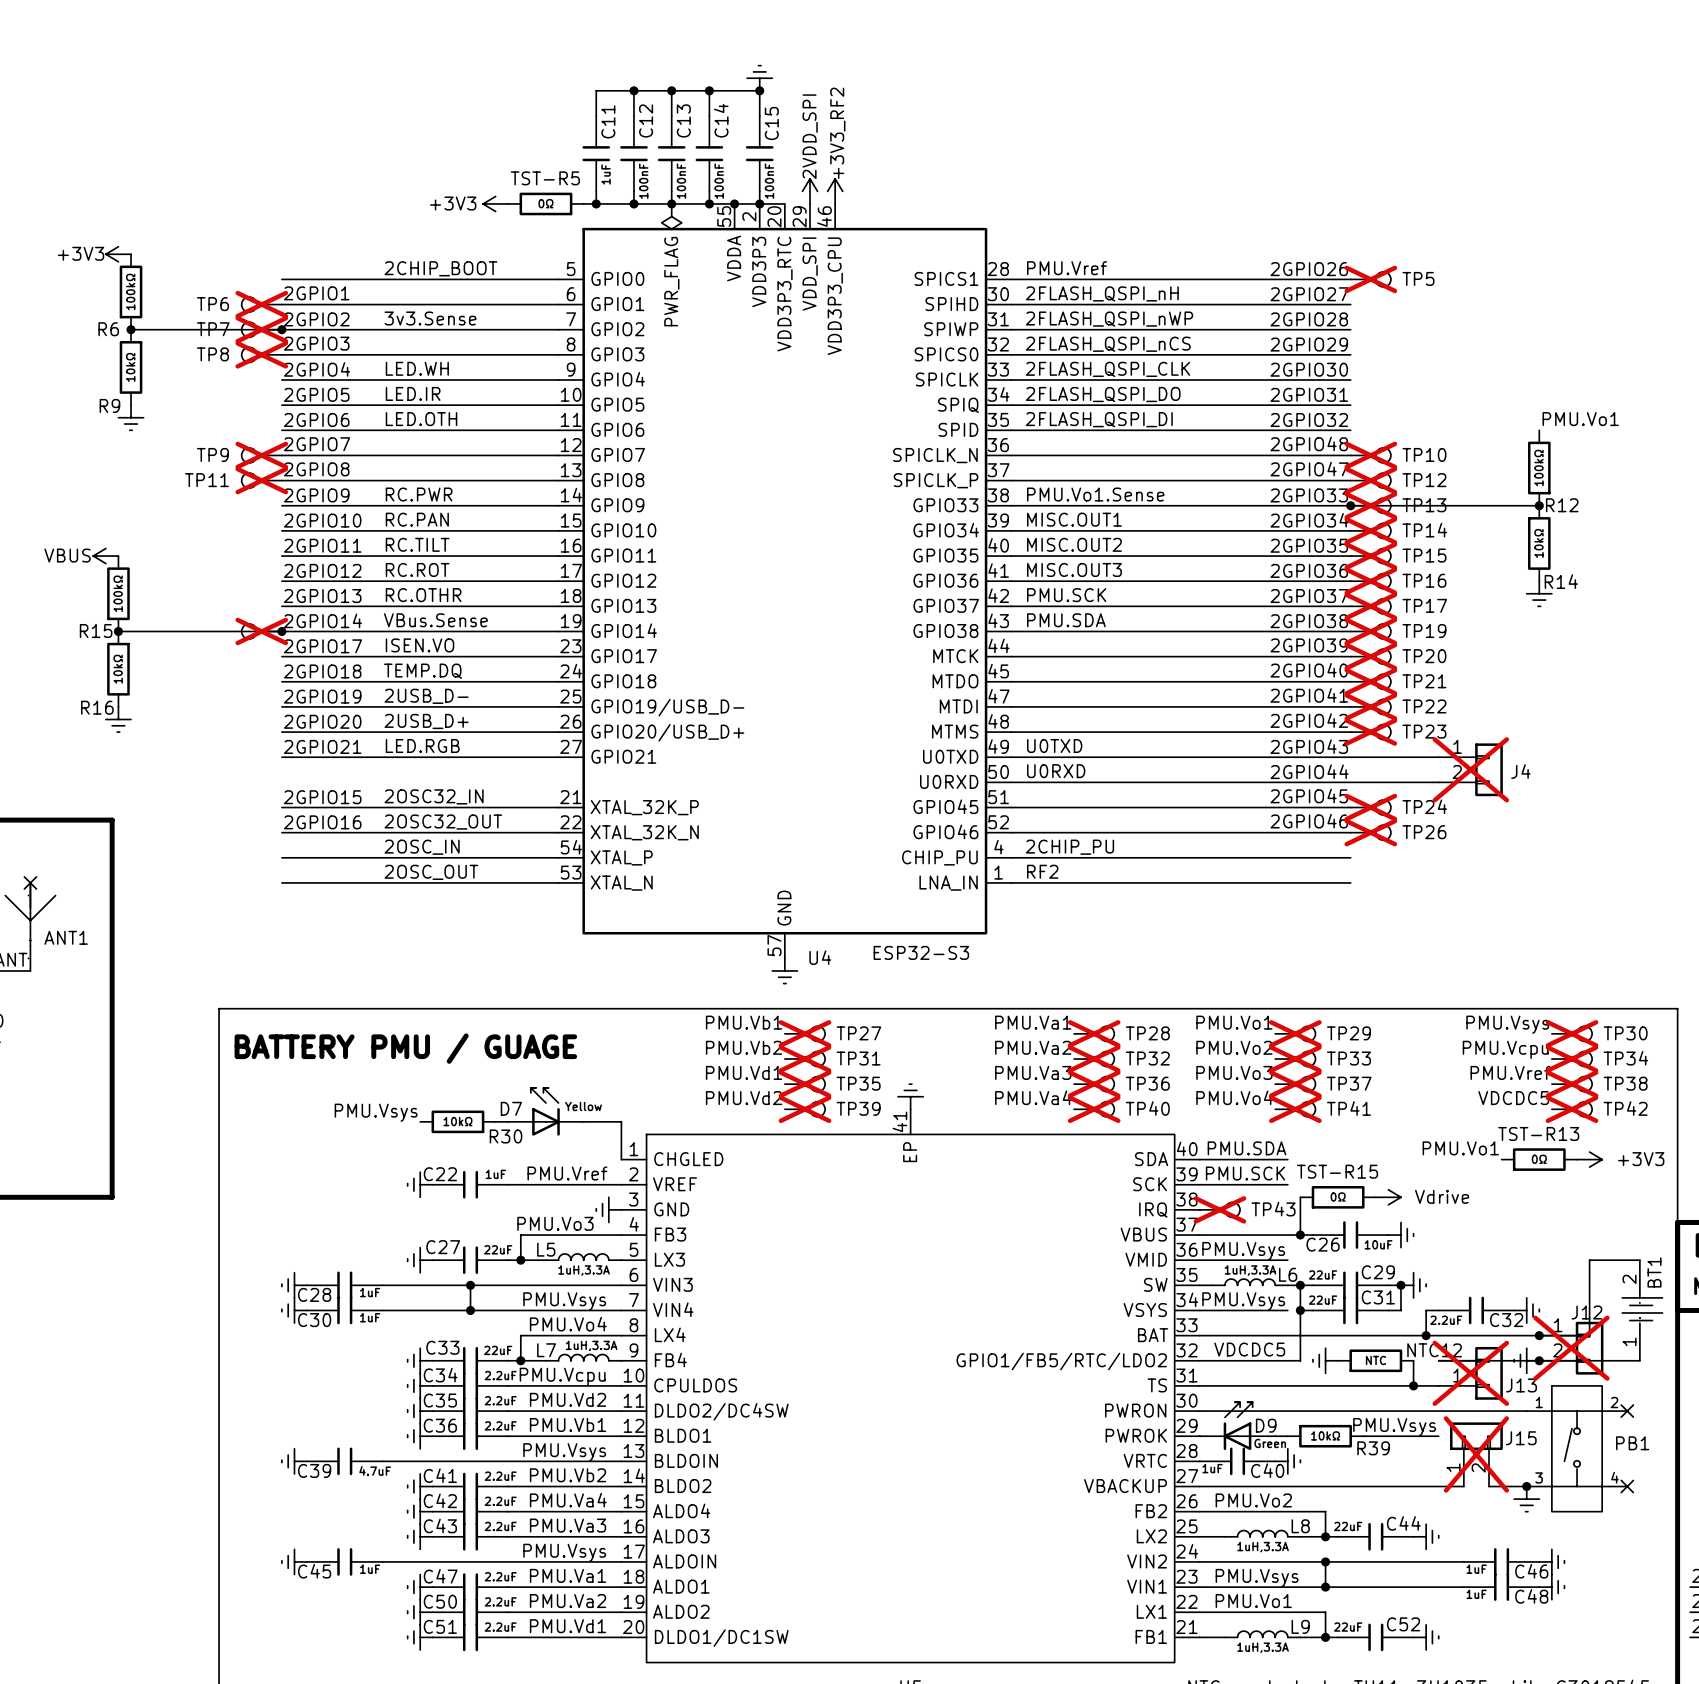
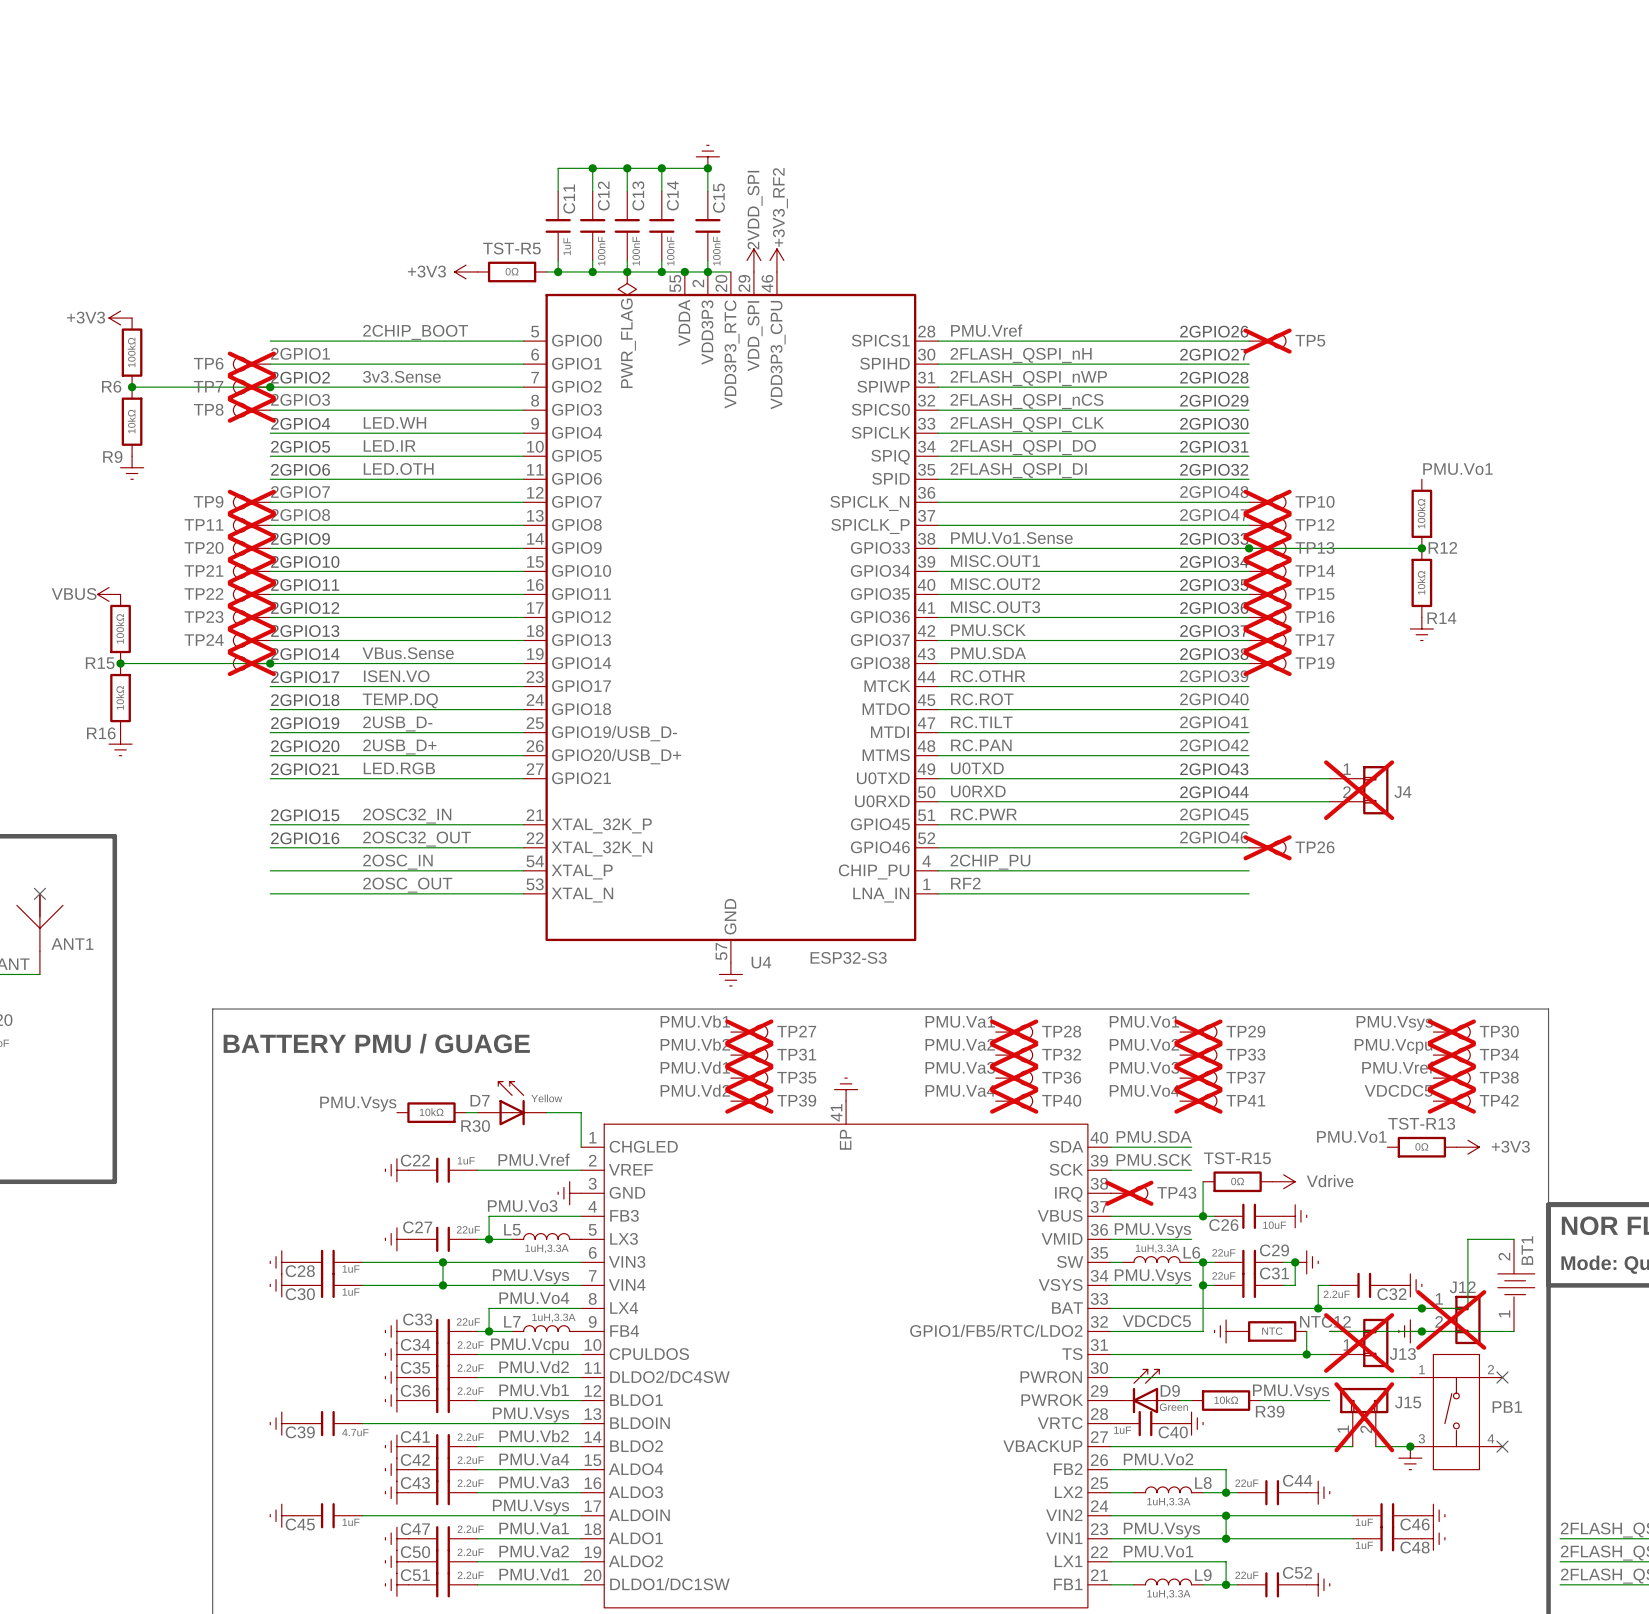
label: RC.PWR (419, 494) -> none
label: RC.PAN (417, 519) -> none
label: RC.TILT (417, 544) -> none
label: RC.ROT (417, 569) -> none
label: RC.OTHR (423, 595) -> none
label: none -> RC.OTHR (988, 676)
TP20 position: (1370, 656) -> (251, 548)
TP20 rotation: 0° (1383, 656) -> 180° (240, 548)
label: none -> RC.ROT (982, 699)
TP21 position: (1370, 681) -> (251, 571)
TP21 rotation: 0° (1383, 681) -> 180° (240, 571)
label: none -> RC.TILT (981, 722)
TP22 position: (1370, 706) -> (251, 594)
TP22 rotation: 0° (1383, 706) -> 180° (240, 594)
label: none -> RC.PAN (981, 745)
TP23 position: (1370, 732) -> (251, 617)
TP23 rotation: 0° (1383, 732) -> 180° (240, 617)
label: none -> RC.PWR (983, 814)
TP24 position: (1370, 807) -> (251, 640)
TP24 rotation: 0° (1383, 807) -> 180° (240, 640)

